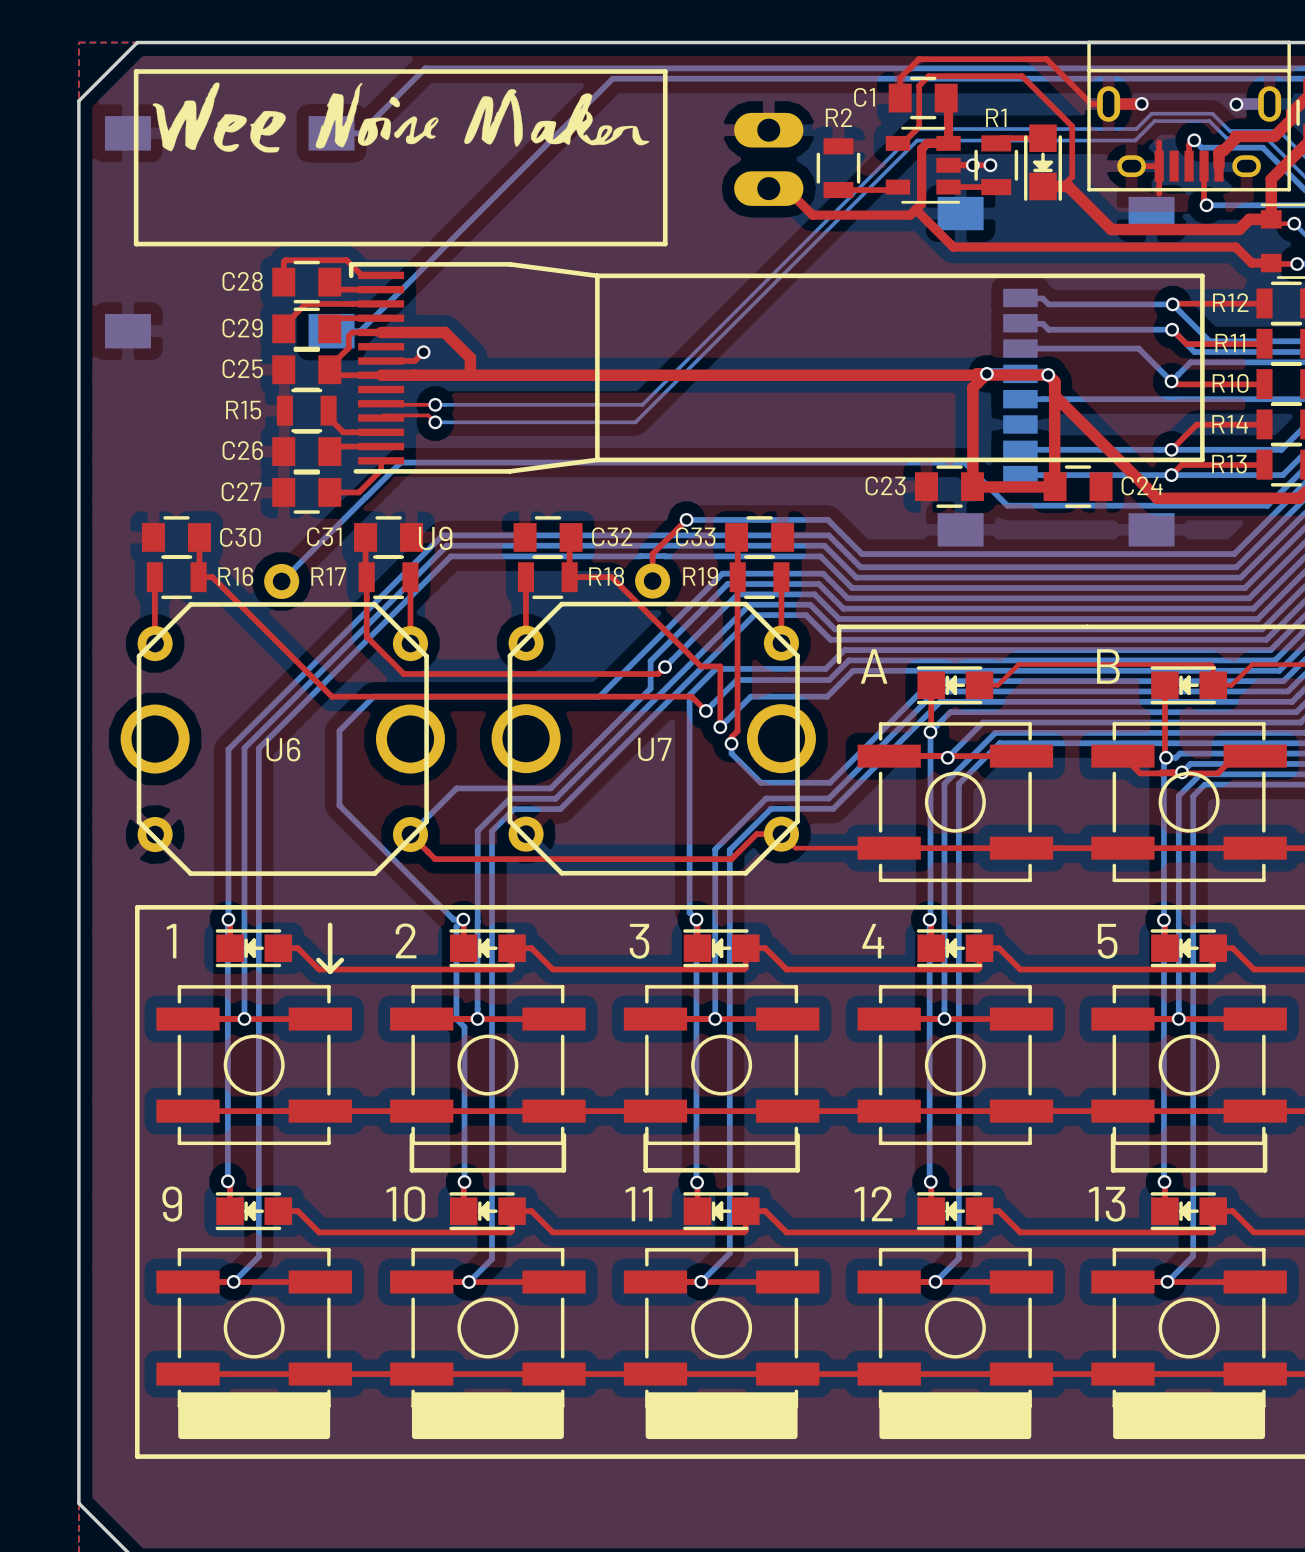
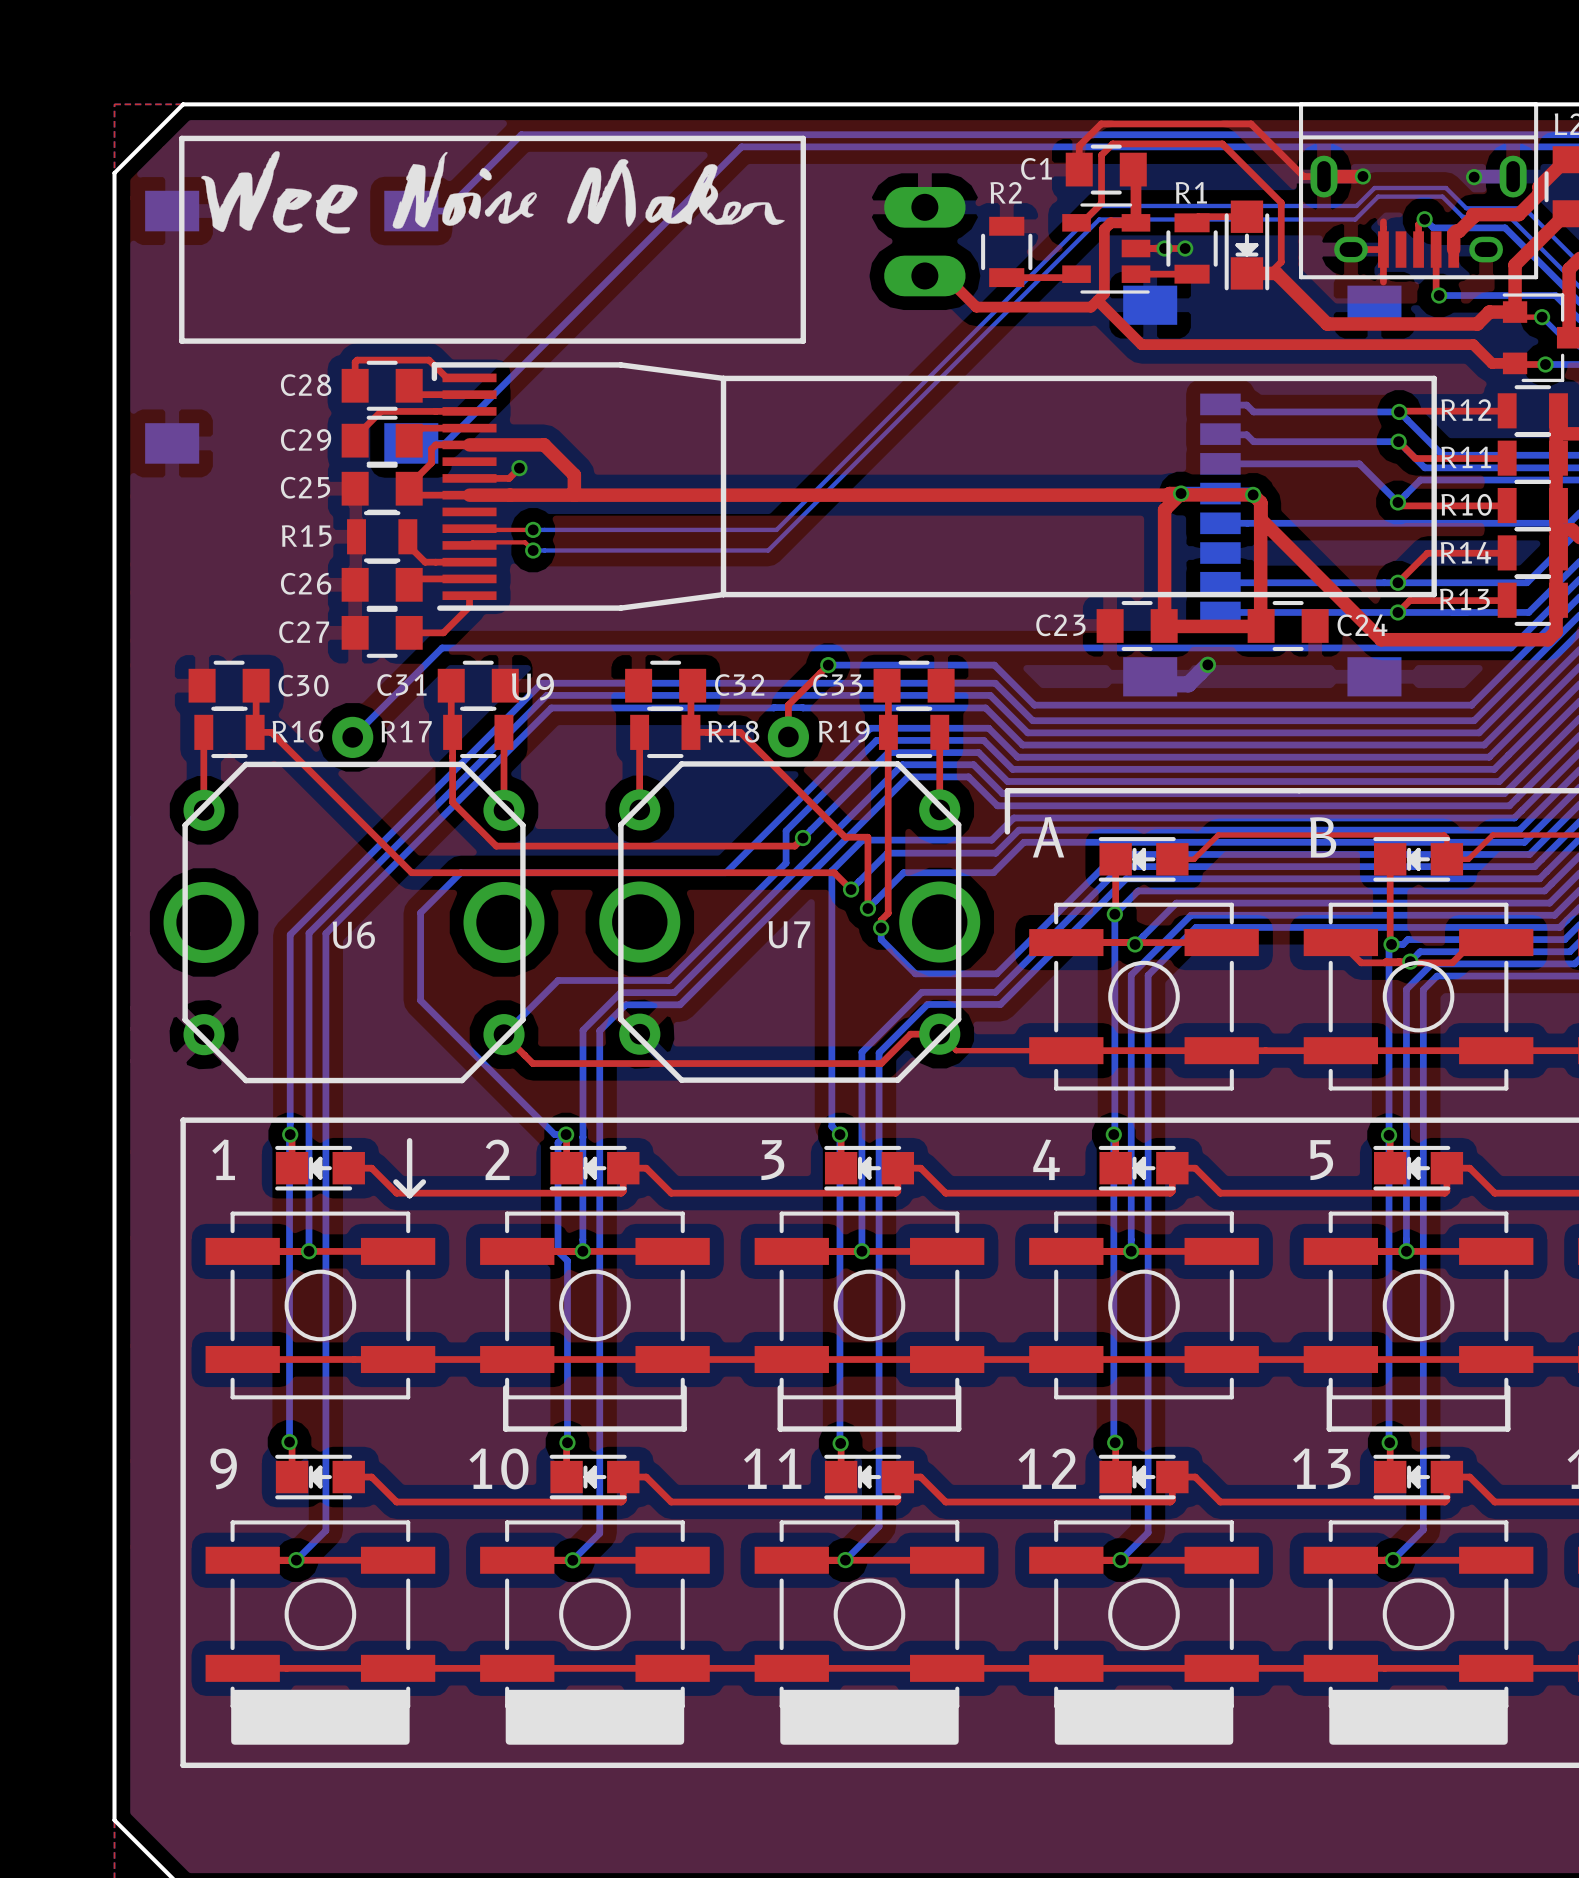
bottom track: (366, 497) (400, 462) (964, 462) (1007, 505) (1267, 505) -> (442, 647) (1511, 647)
bottom track: (366, 497) (357, 505) -> none
bottom track: none -> (1207, 664) (1188, 684) (1150, 684)
via: none -> (1207, 664)

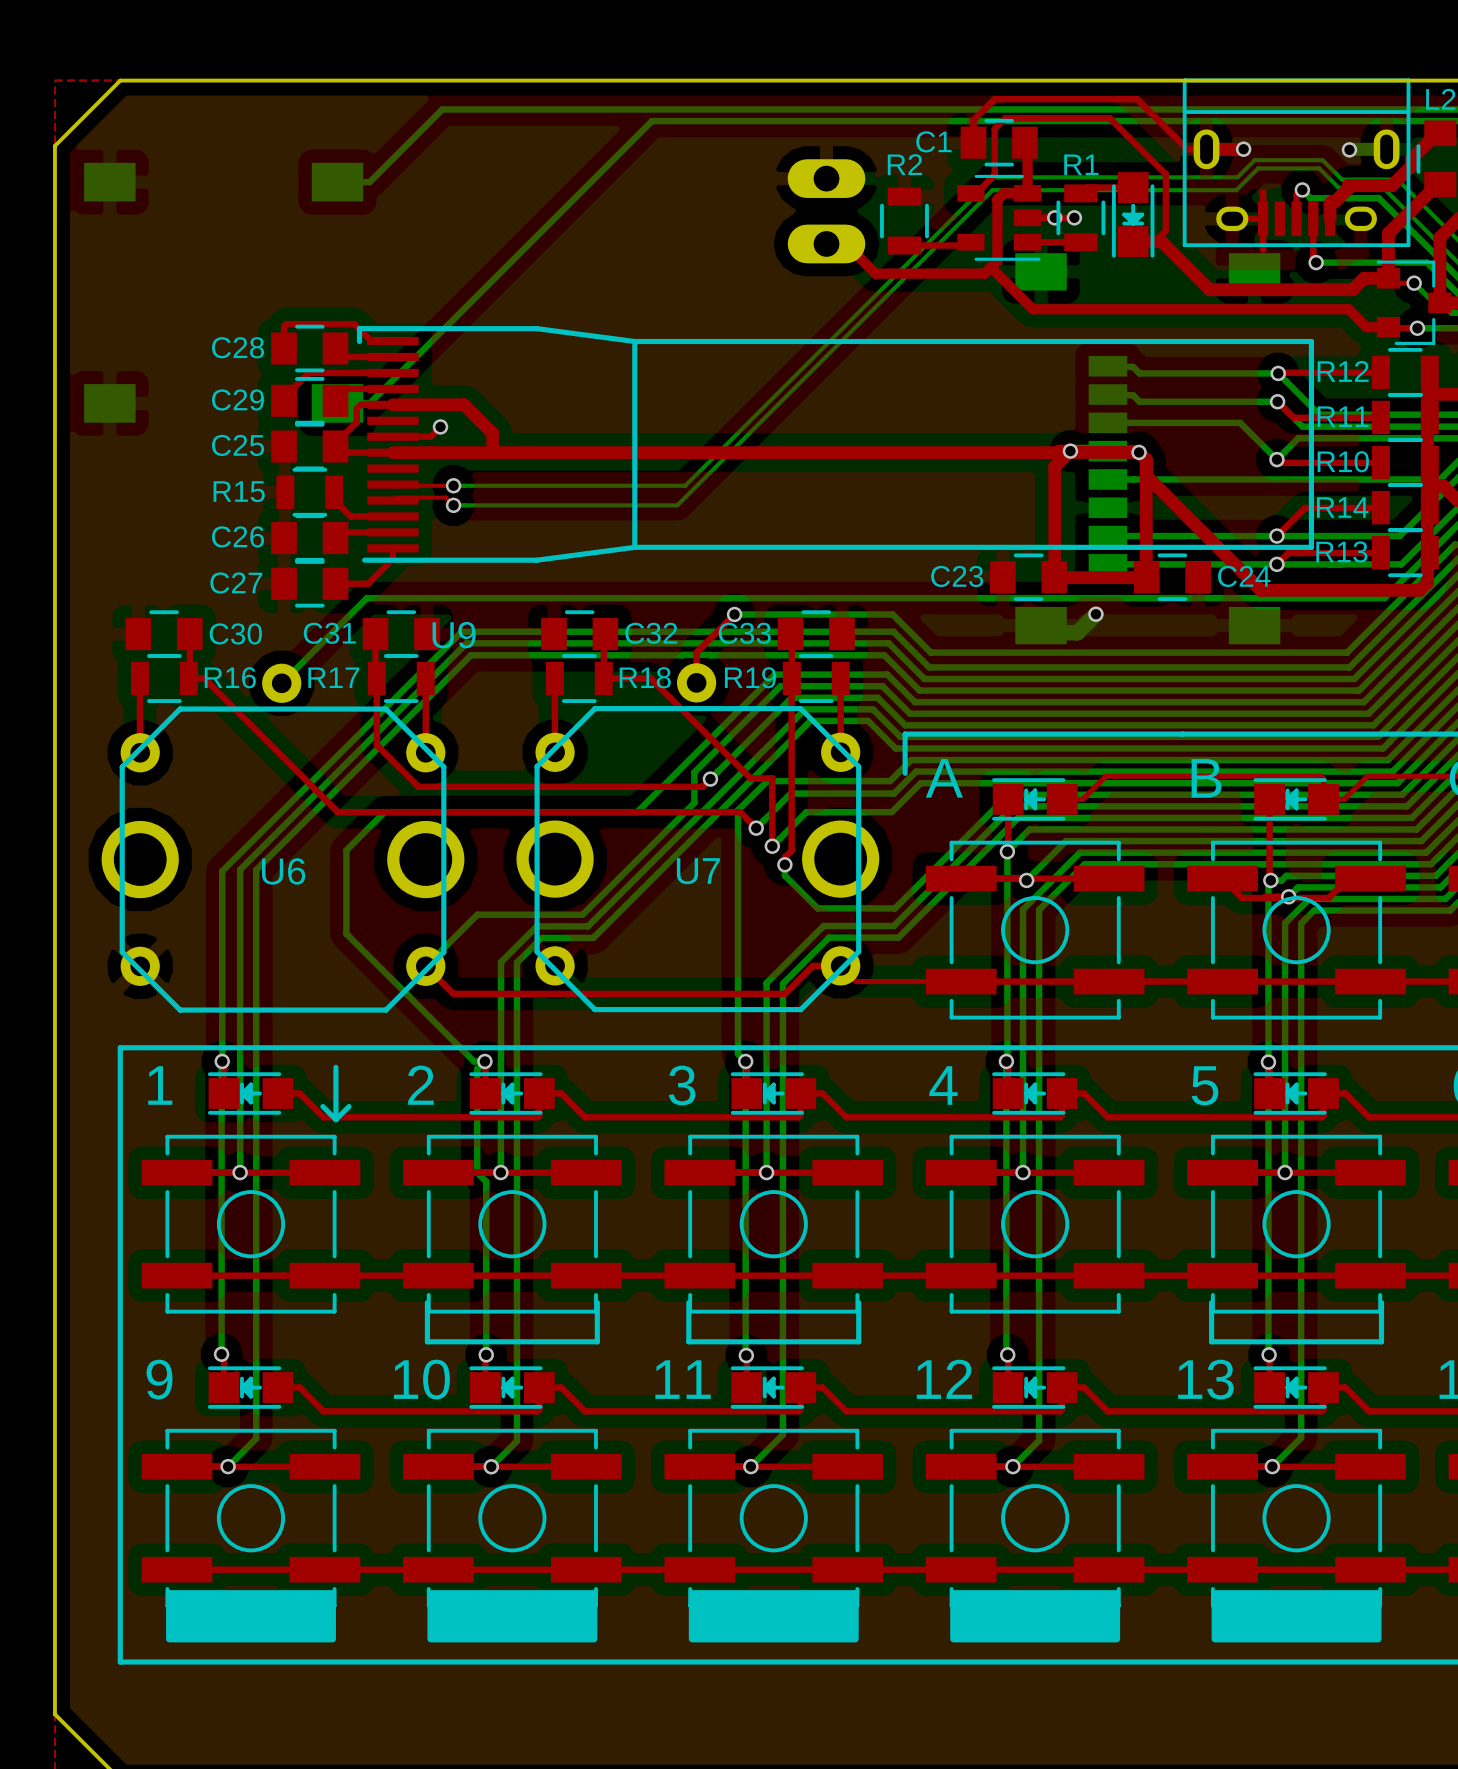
line: (181, 138) (181, 341) (803, 341) (803, 138) (181, 138) -> none
drawing: [201, 151, 785, 234] -> none

